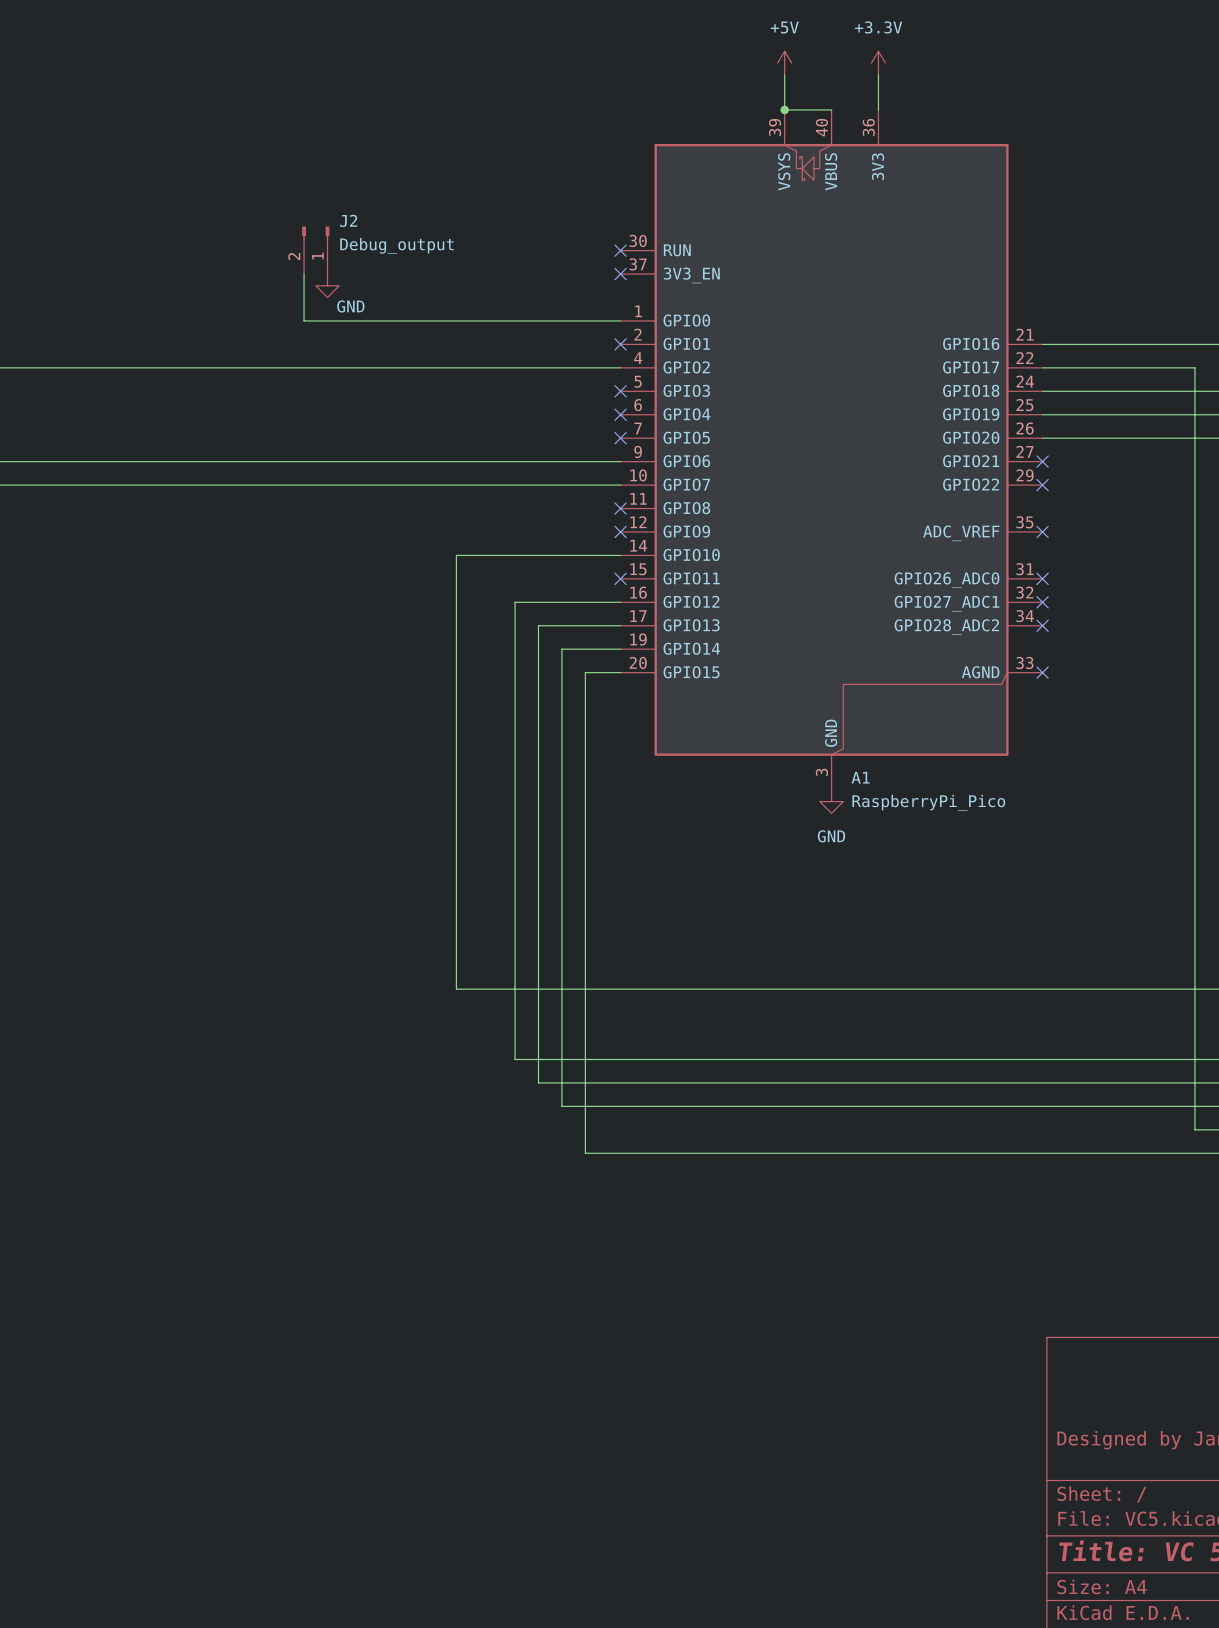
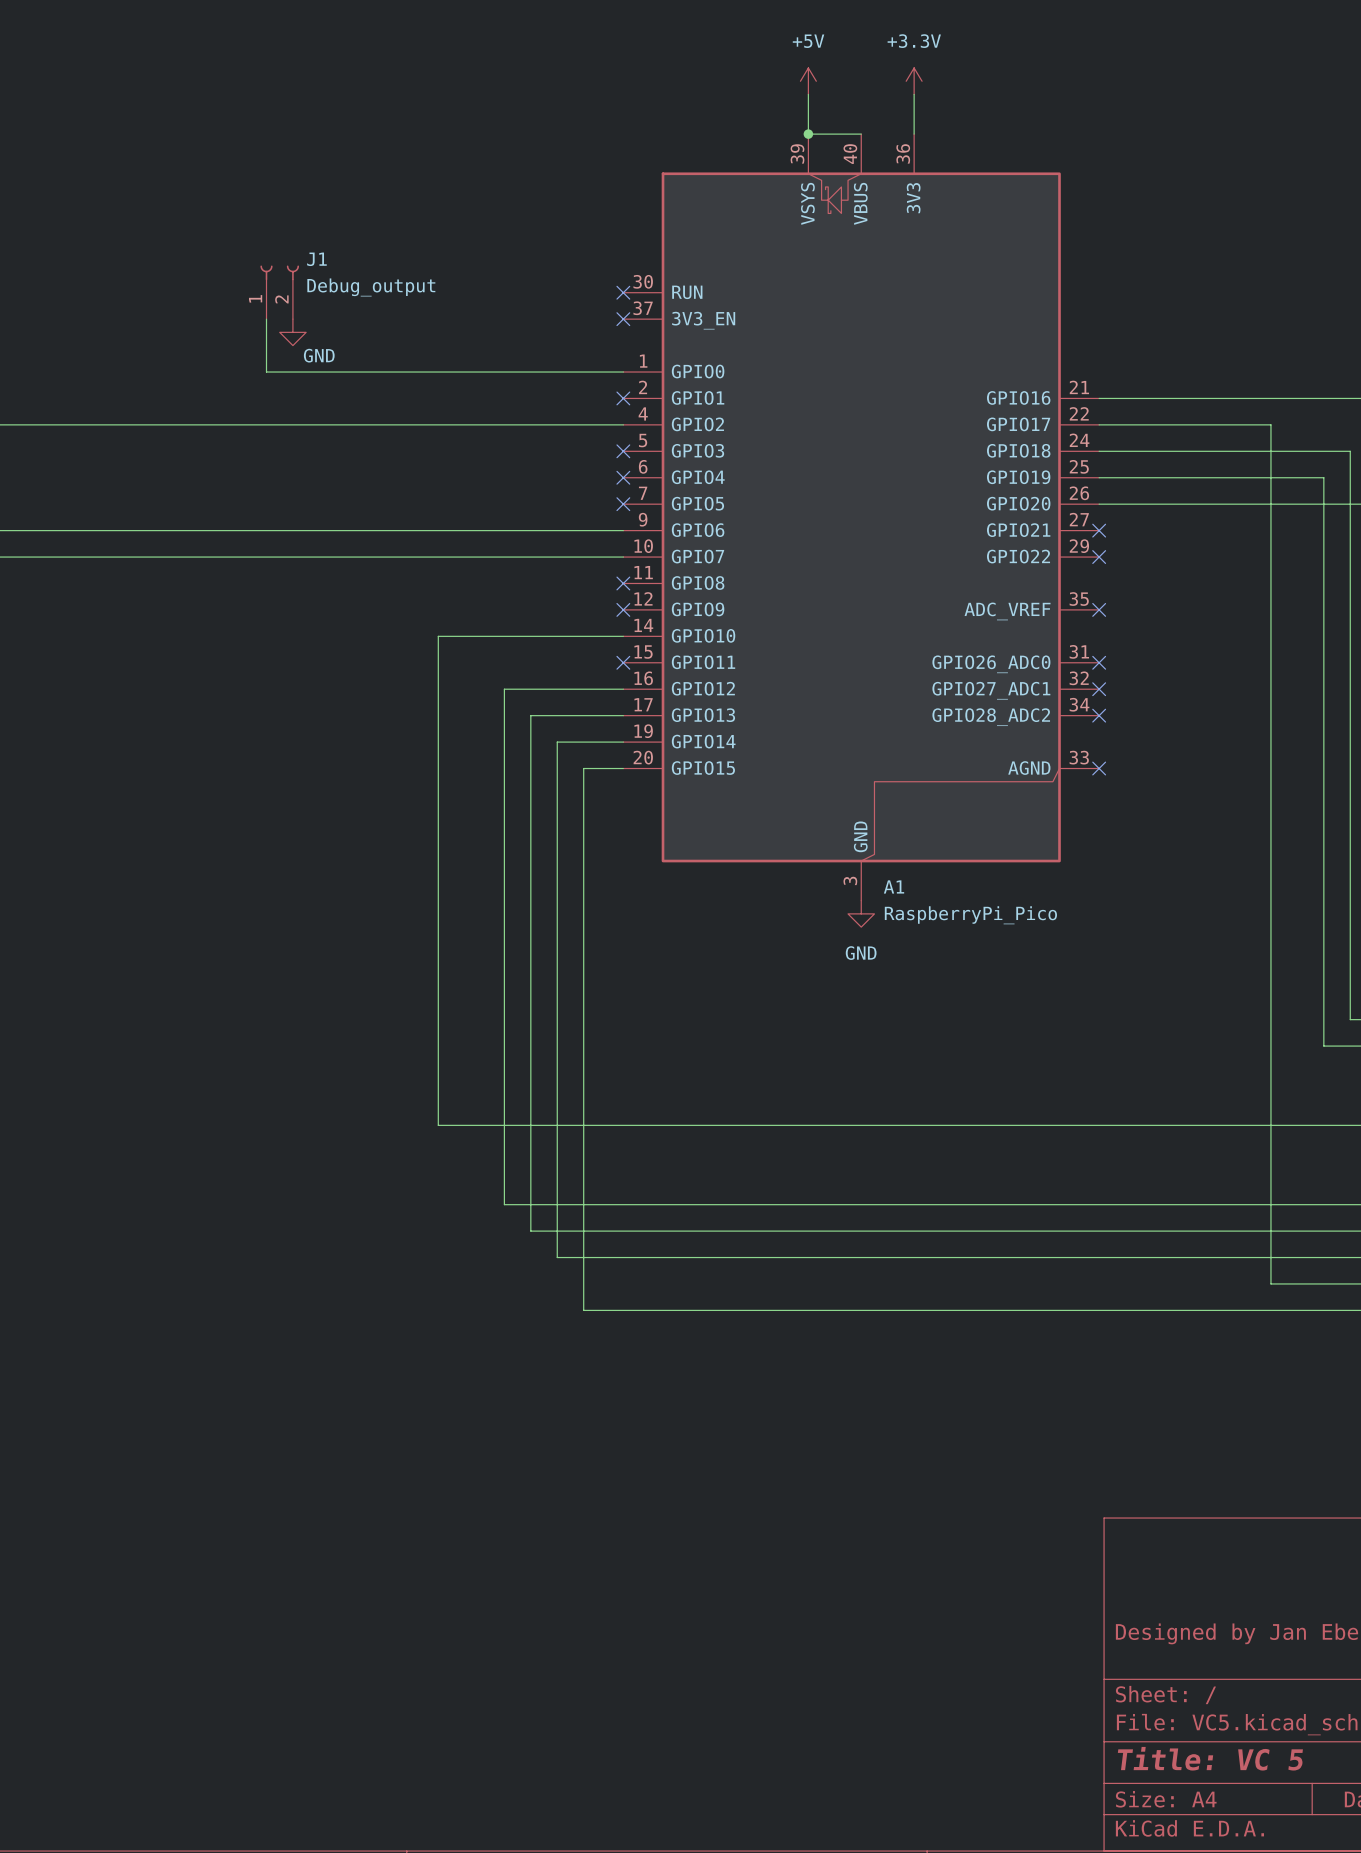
J2: Debug_output (315, 250) -> none
J1: none -> Debug_output (279, 292)

